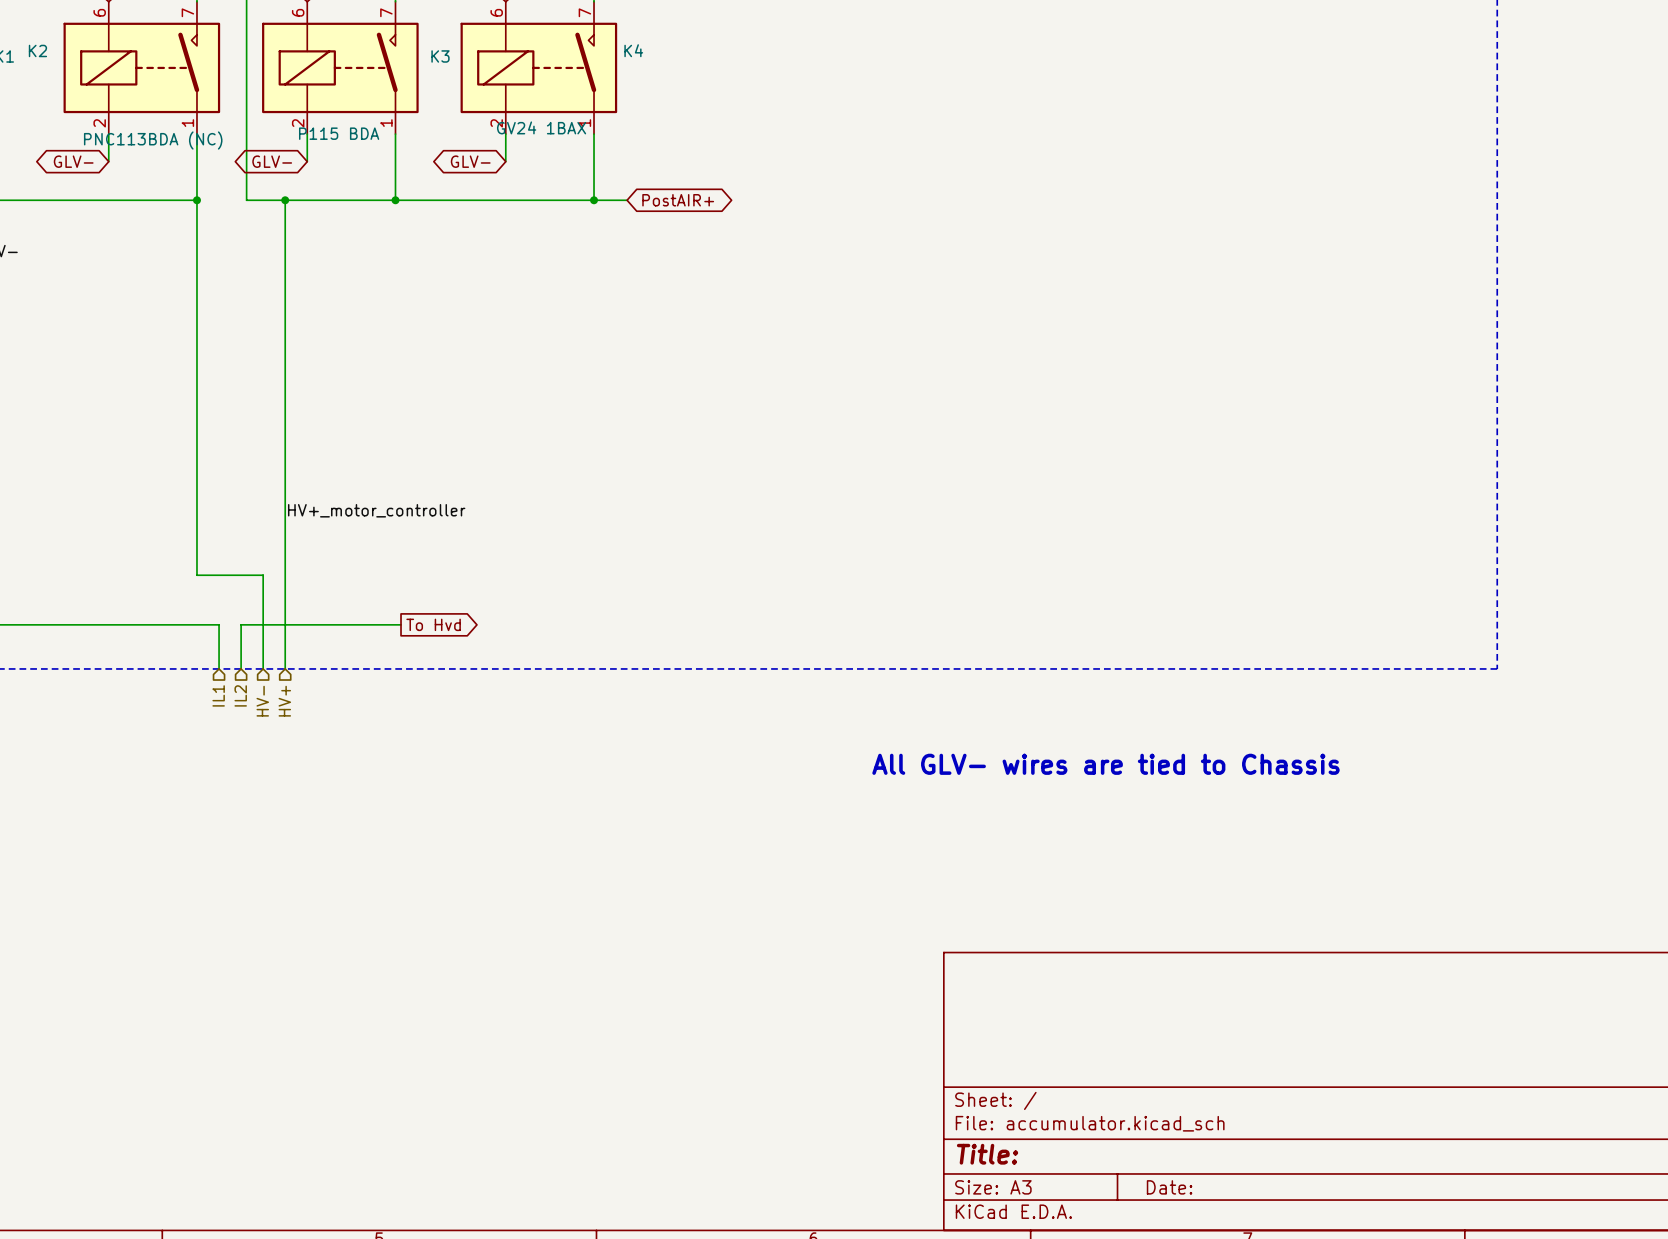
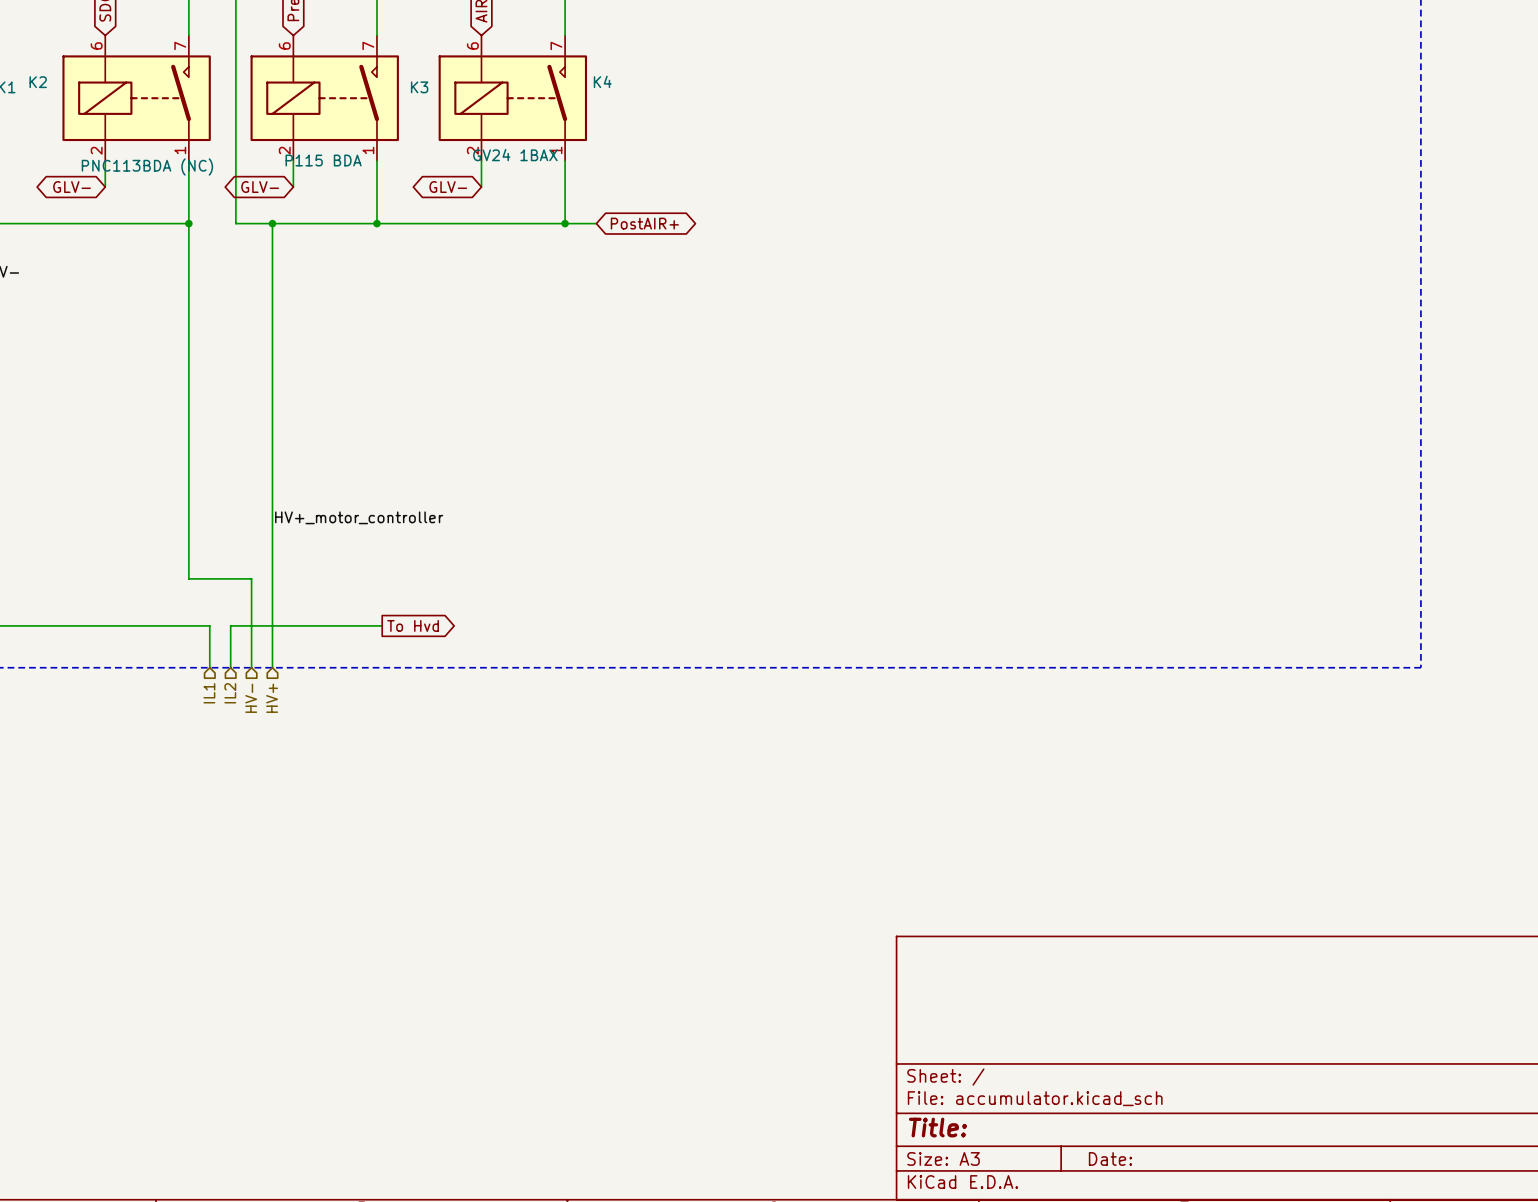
text: All GLV- wires are tied to Chassis (1105, 764) -> none

